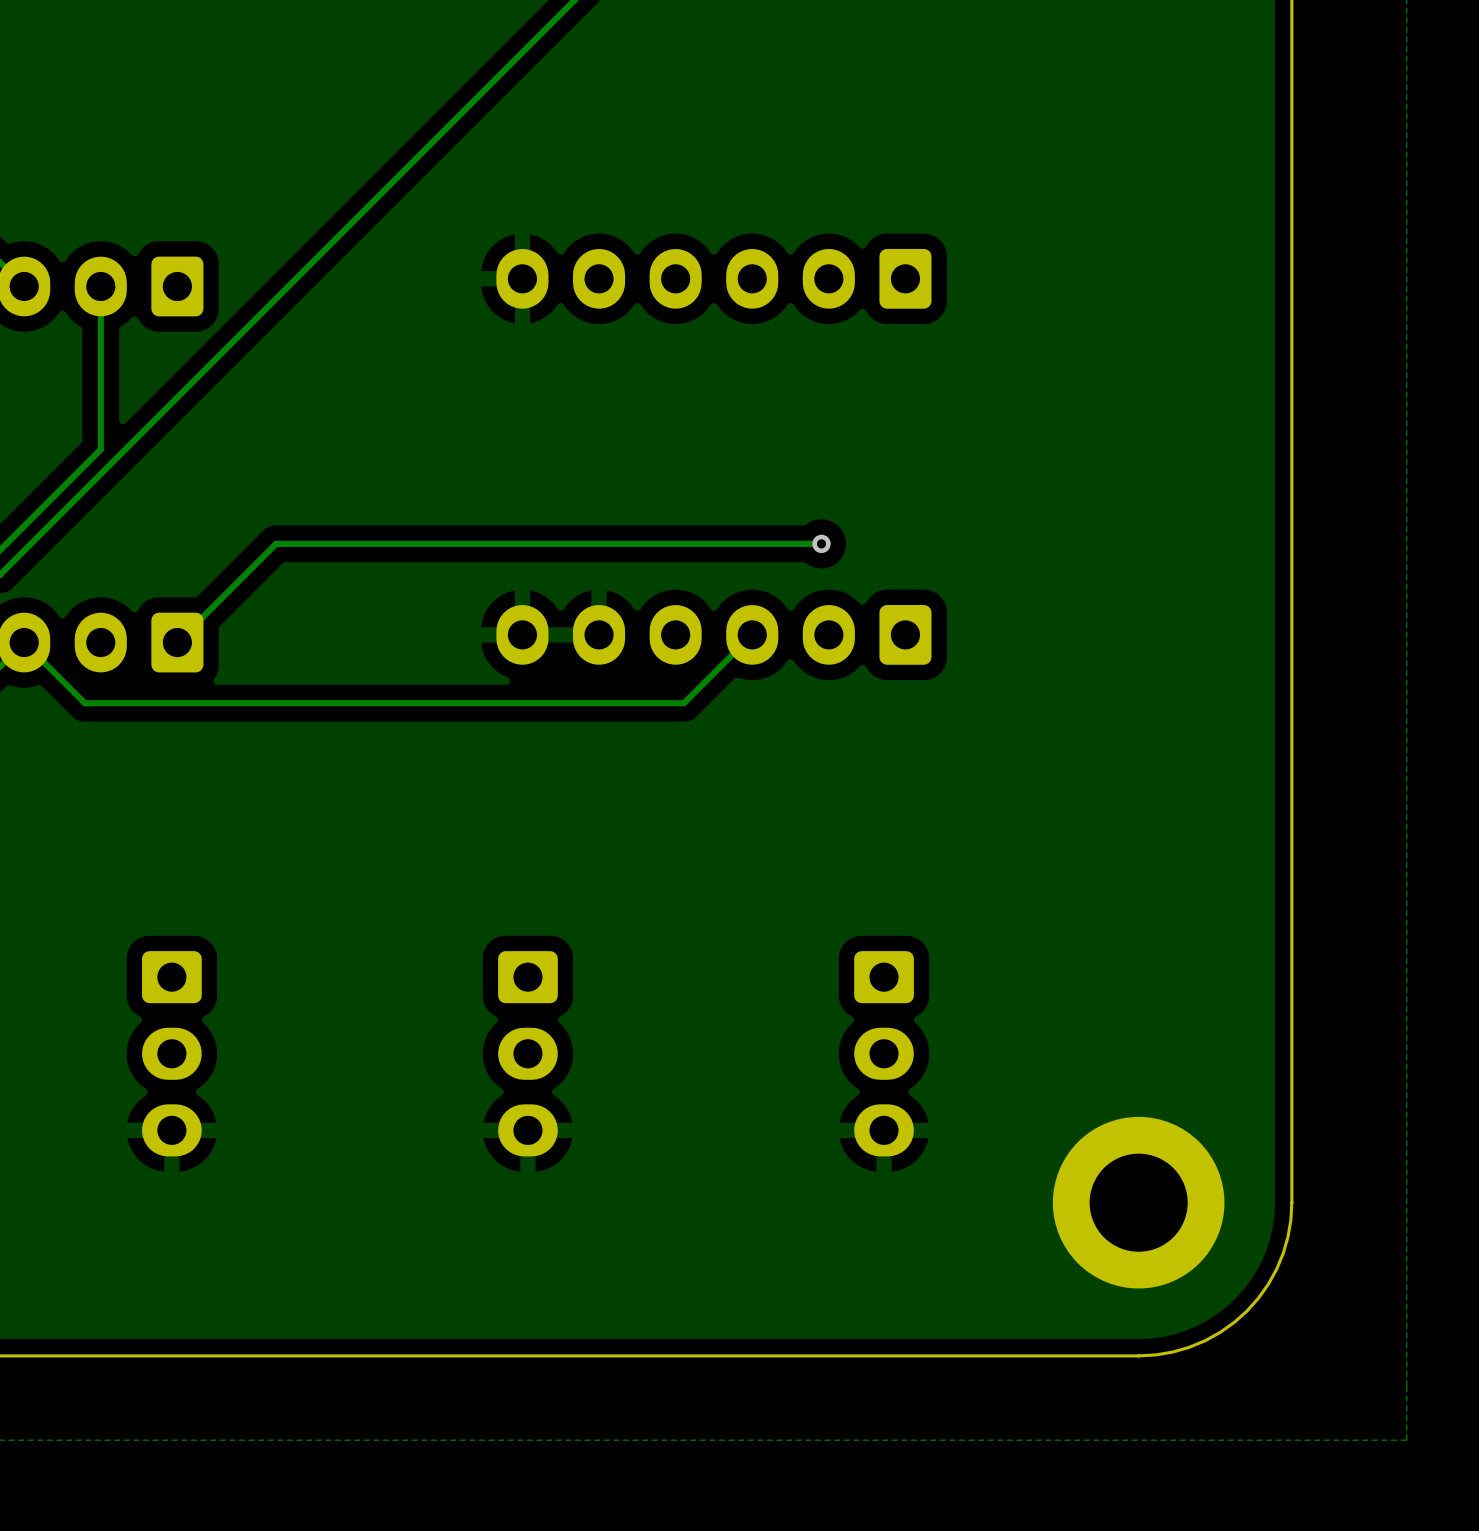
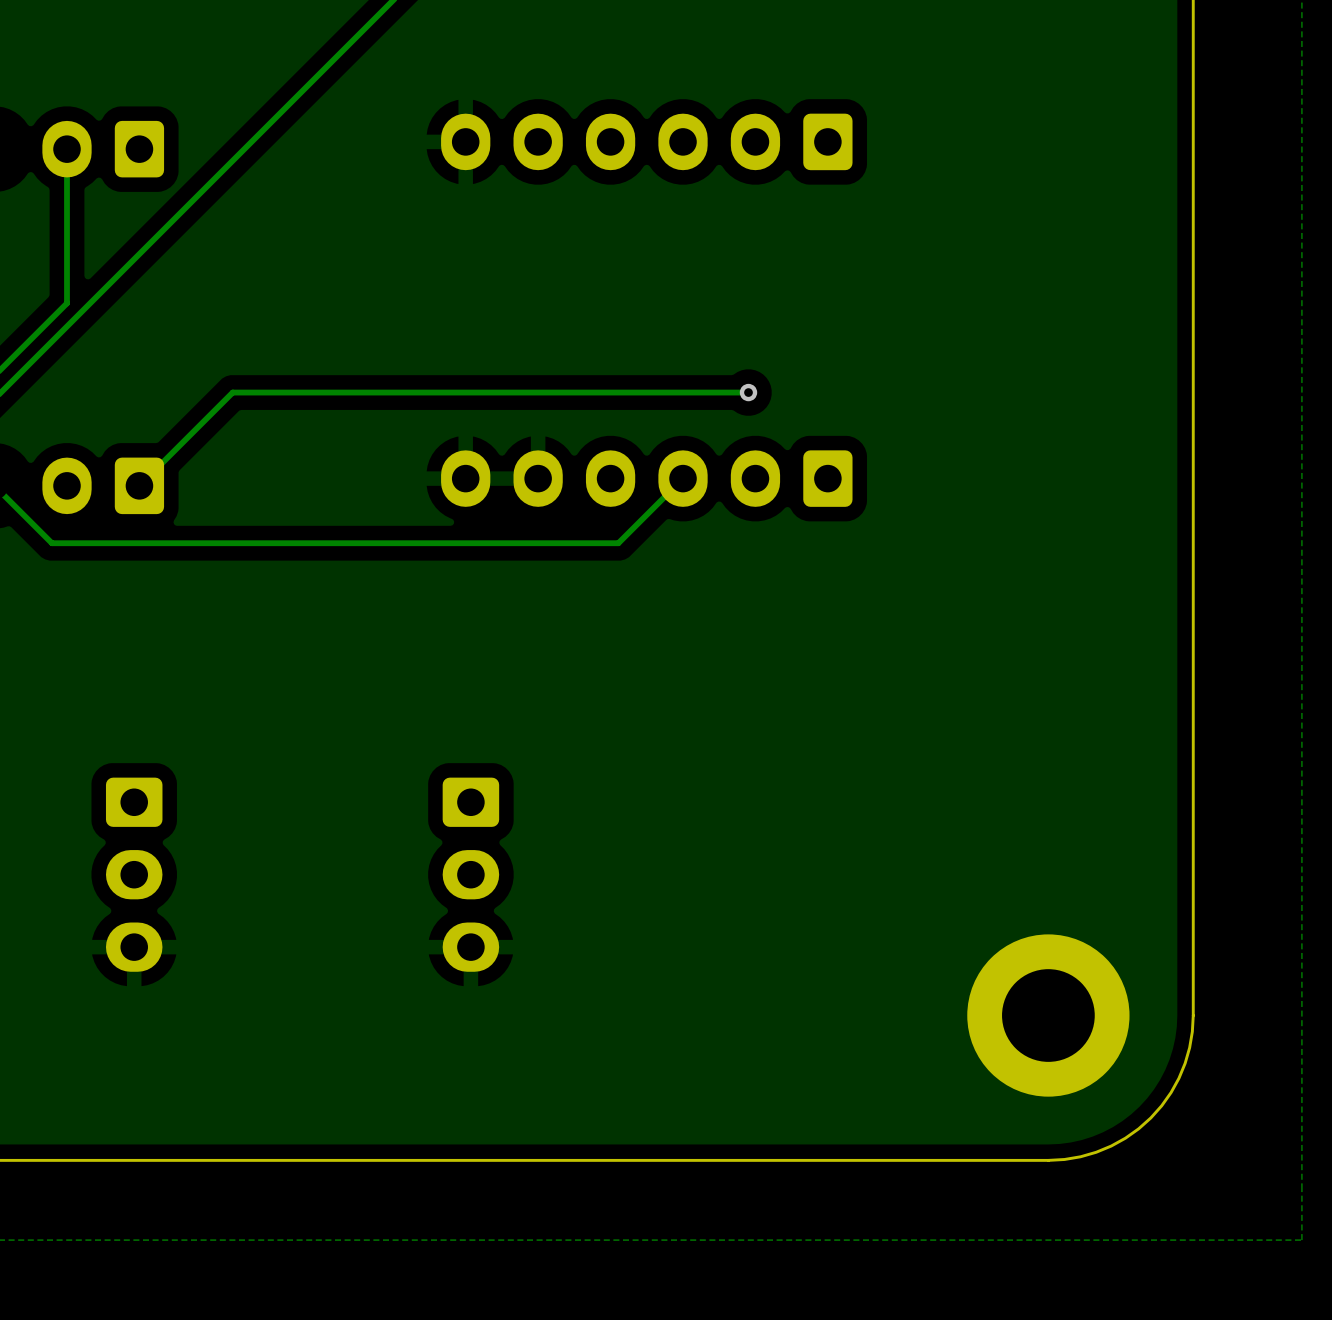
part: (884, 1053) -> none

